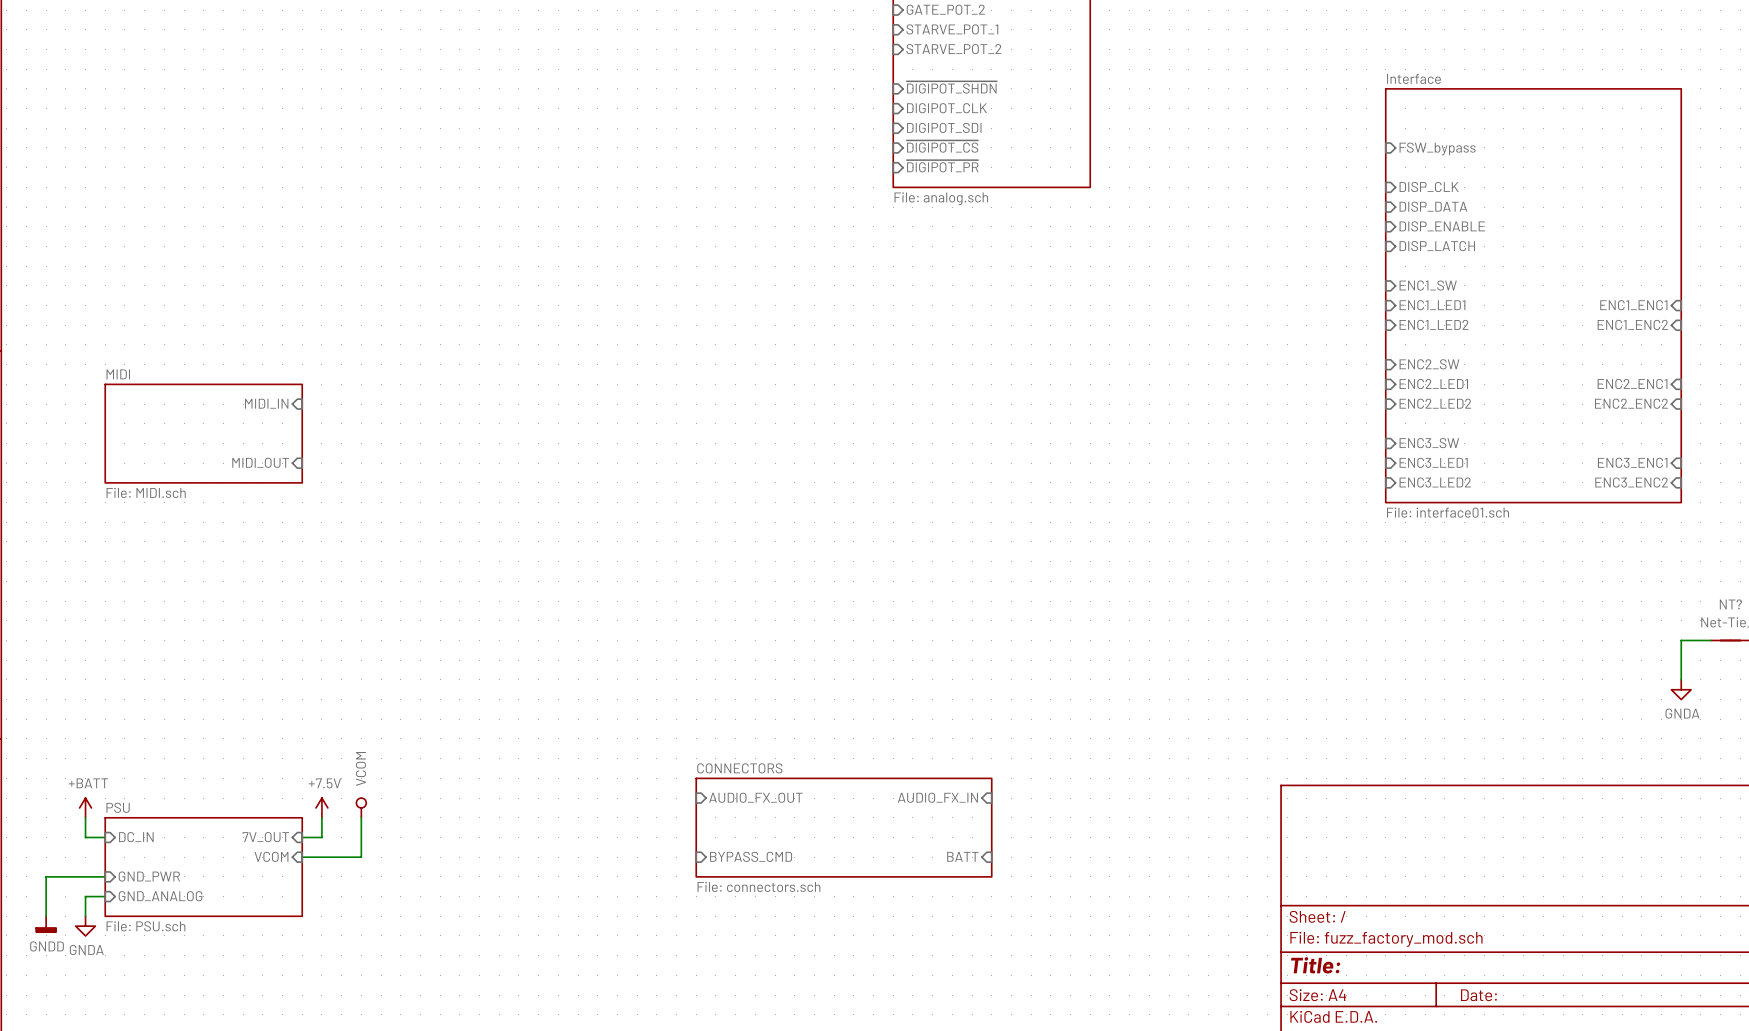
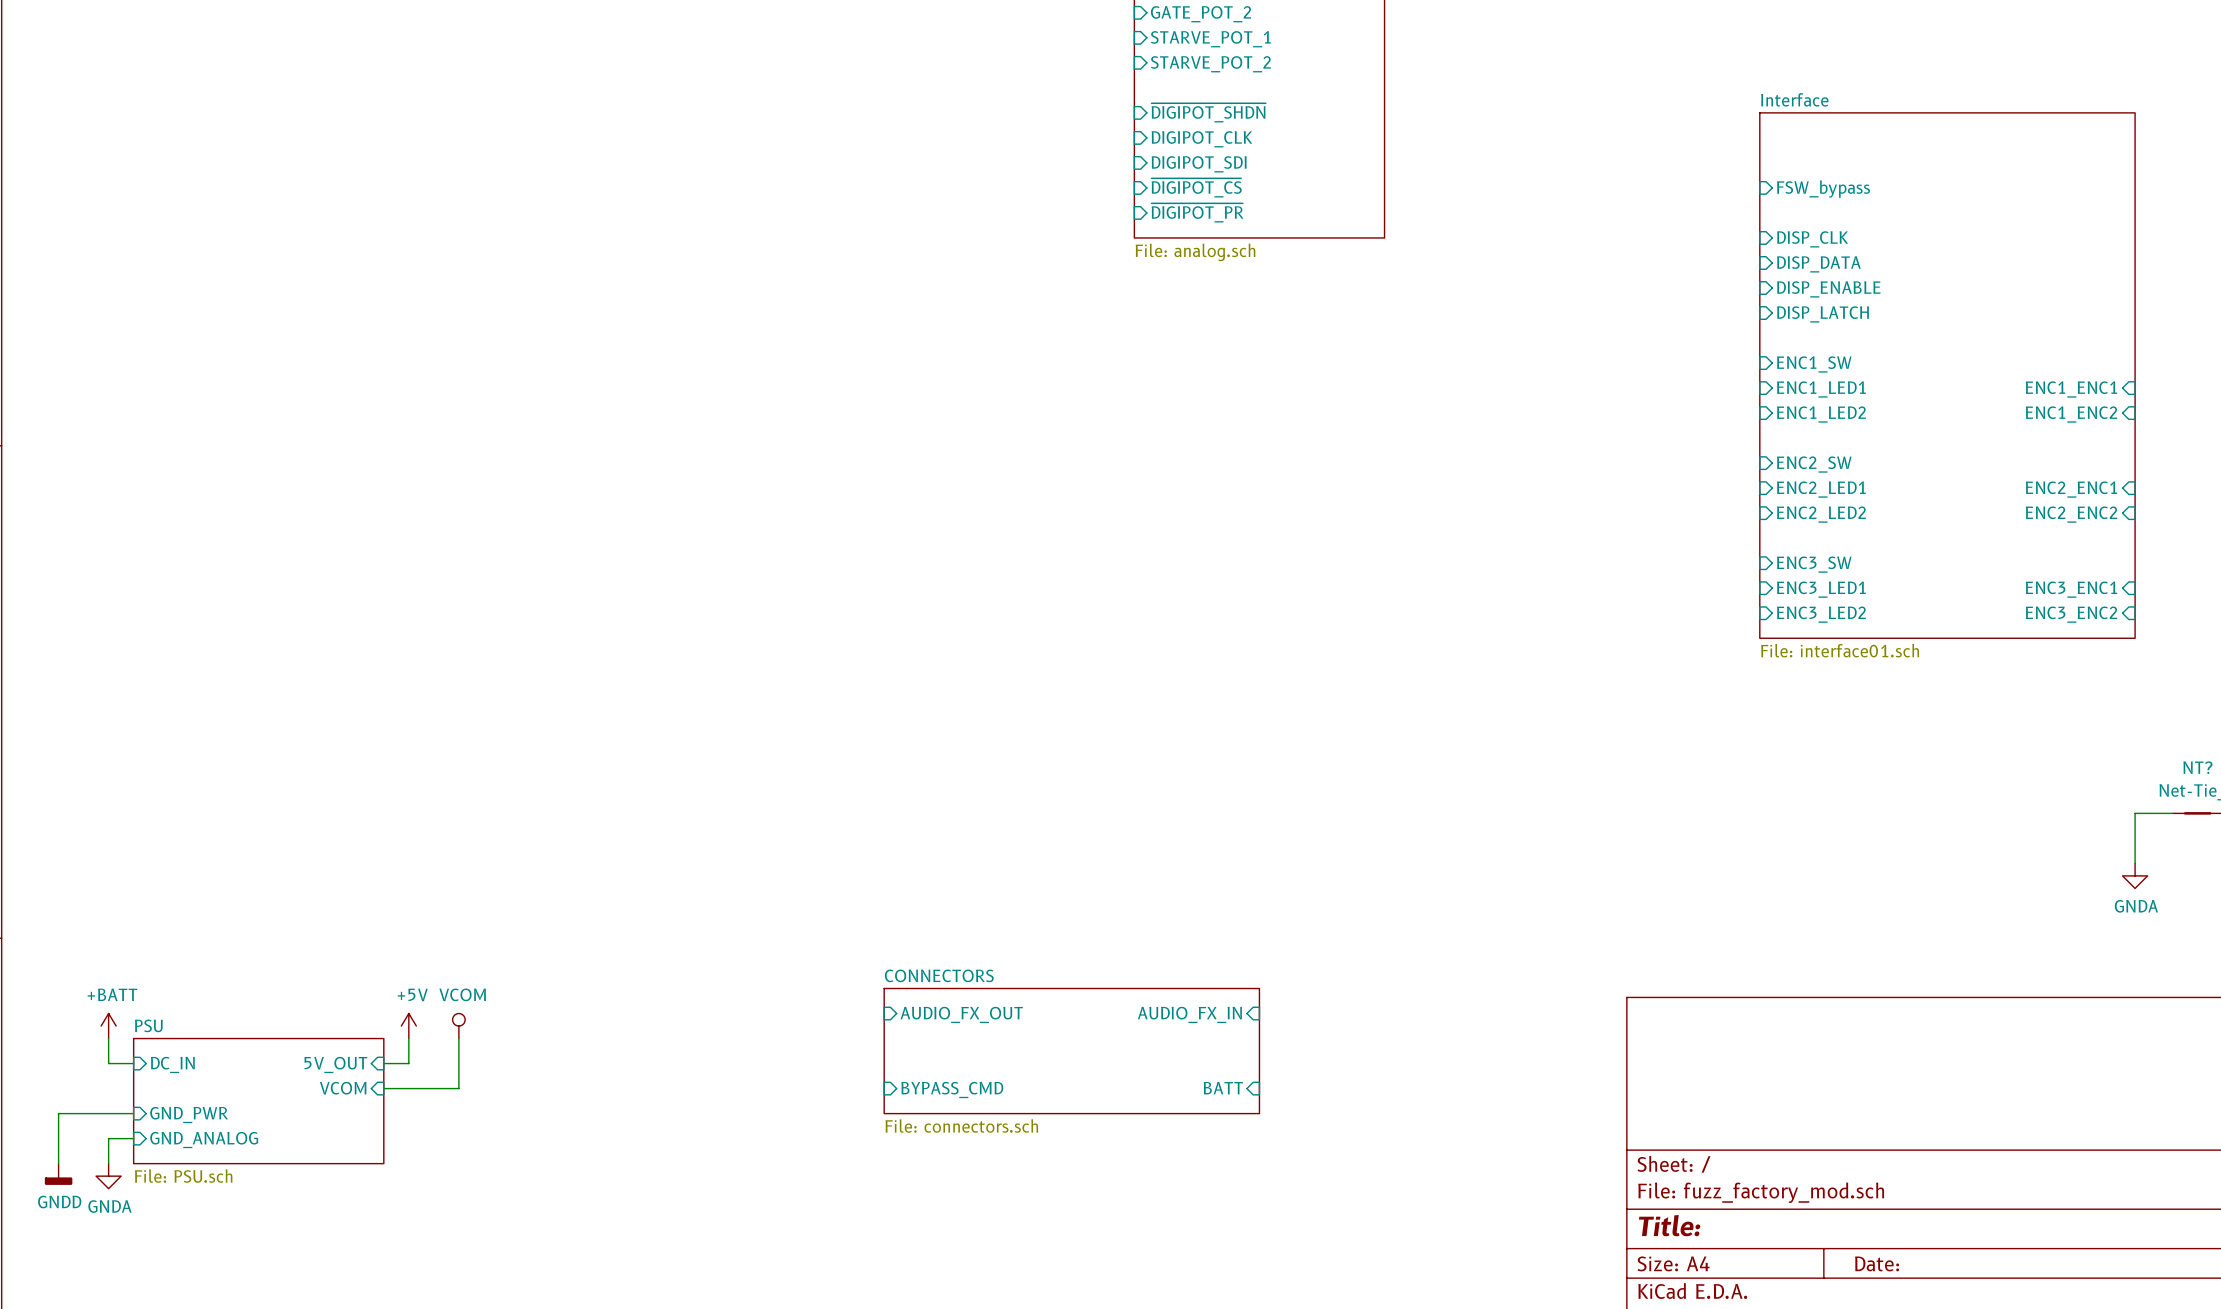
sheet pin: MIDI_IN (266, 403) -> none
sheet MIDI: File: MIDI.sch (203, 433) -> none
sheet pin: MIDI_OUT (260, 462) -> none
power symbol text rotation: 0° (360, 768) -> 90° clockwise (462, 994)
power symbol: +7.5V (321, 807) -> +5V (408, 1026)
sheet pin: 7V_OUT (265, 837) -> 5V_OUT (335, 1064)

